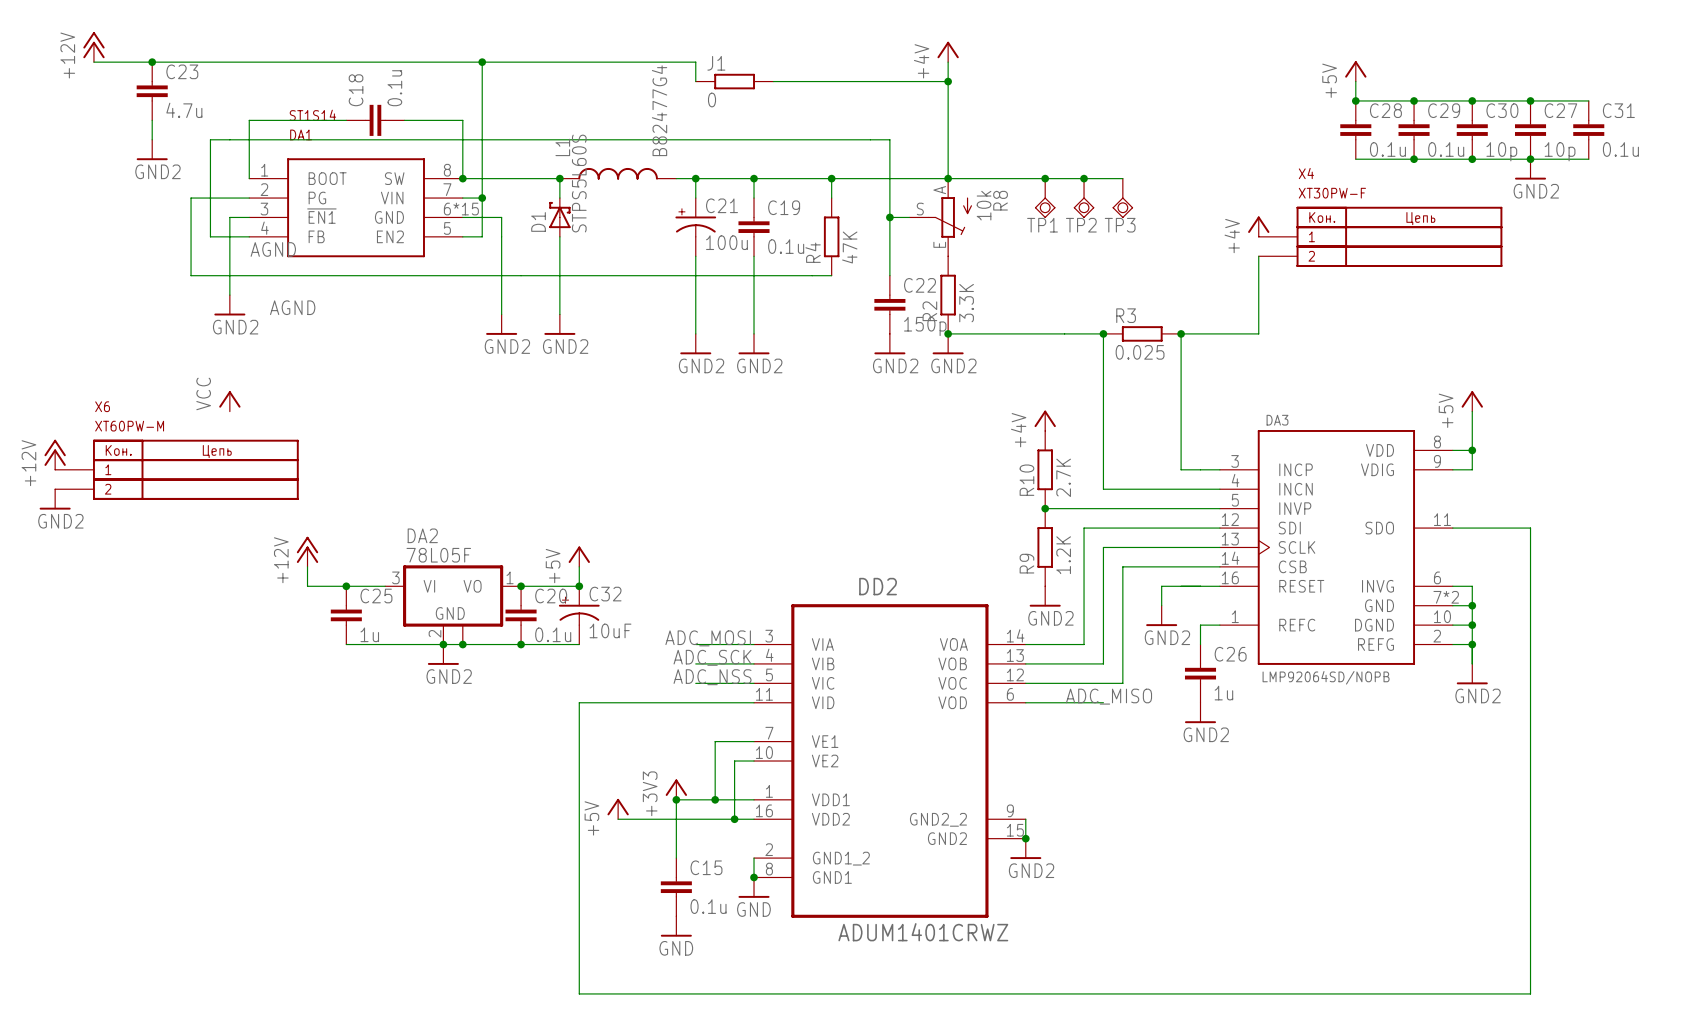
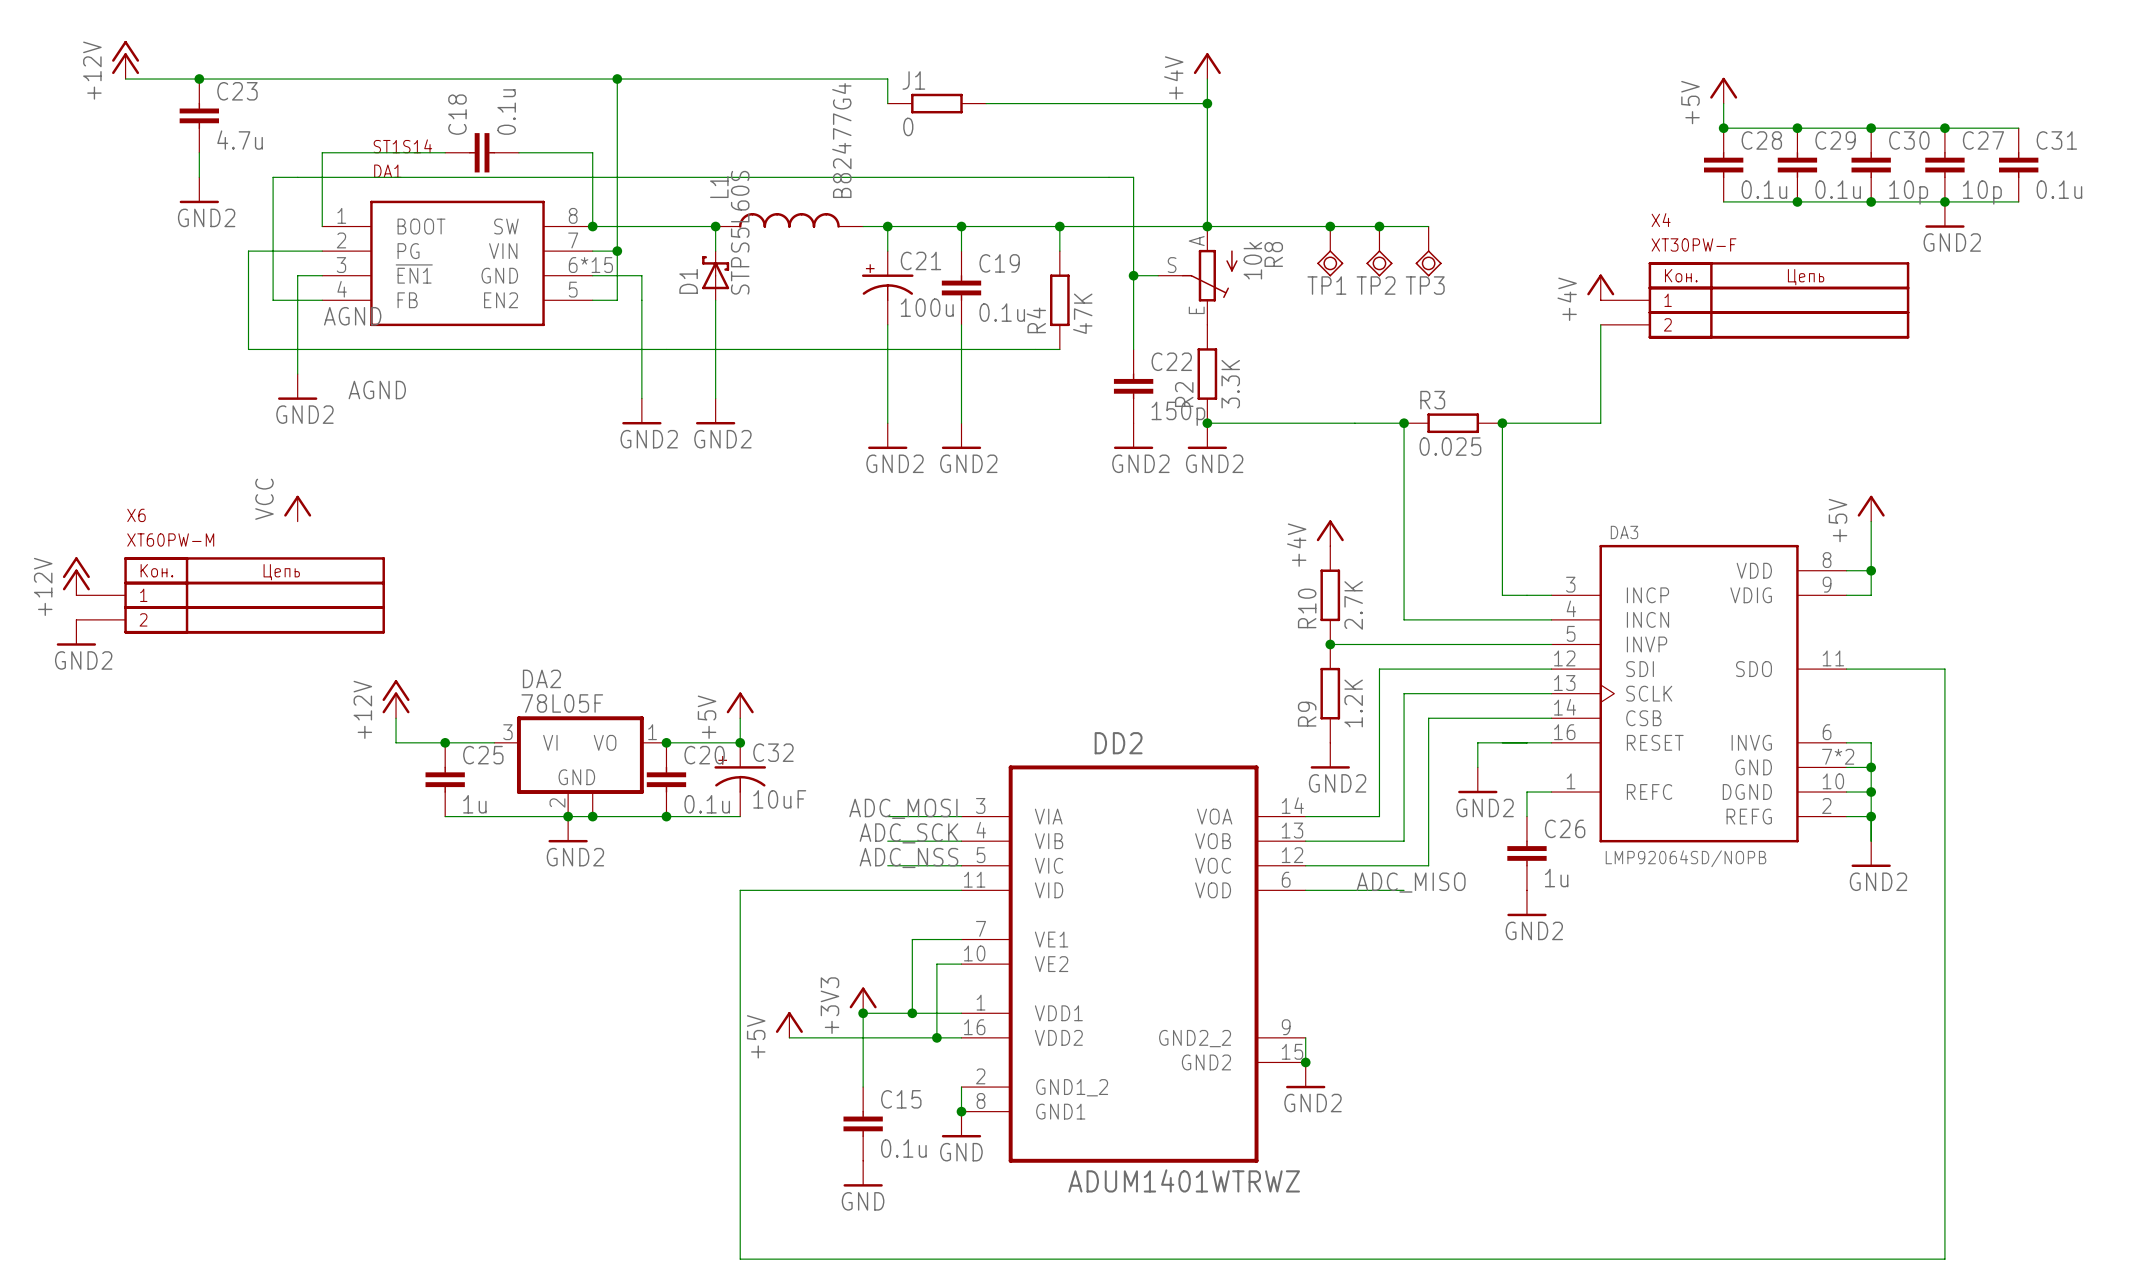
DD2 value: ADUM1401CRWZ (923, 932) -> ADUM1401WTRWZ (1184, 1180)

